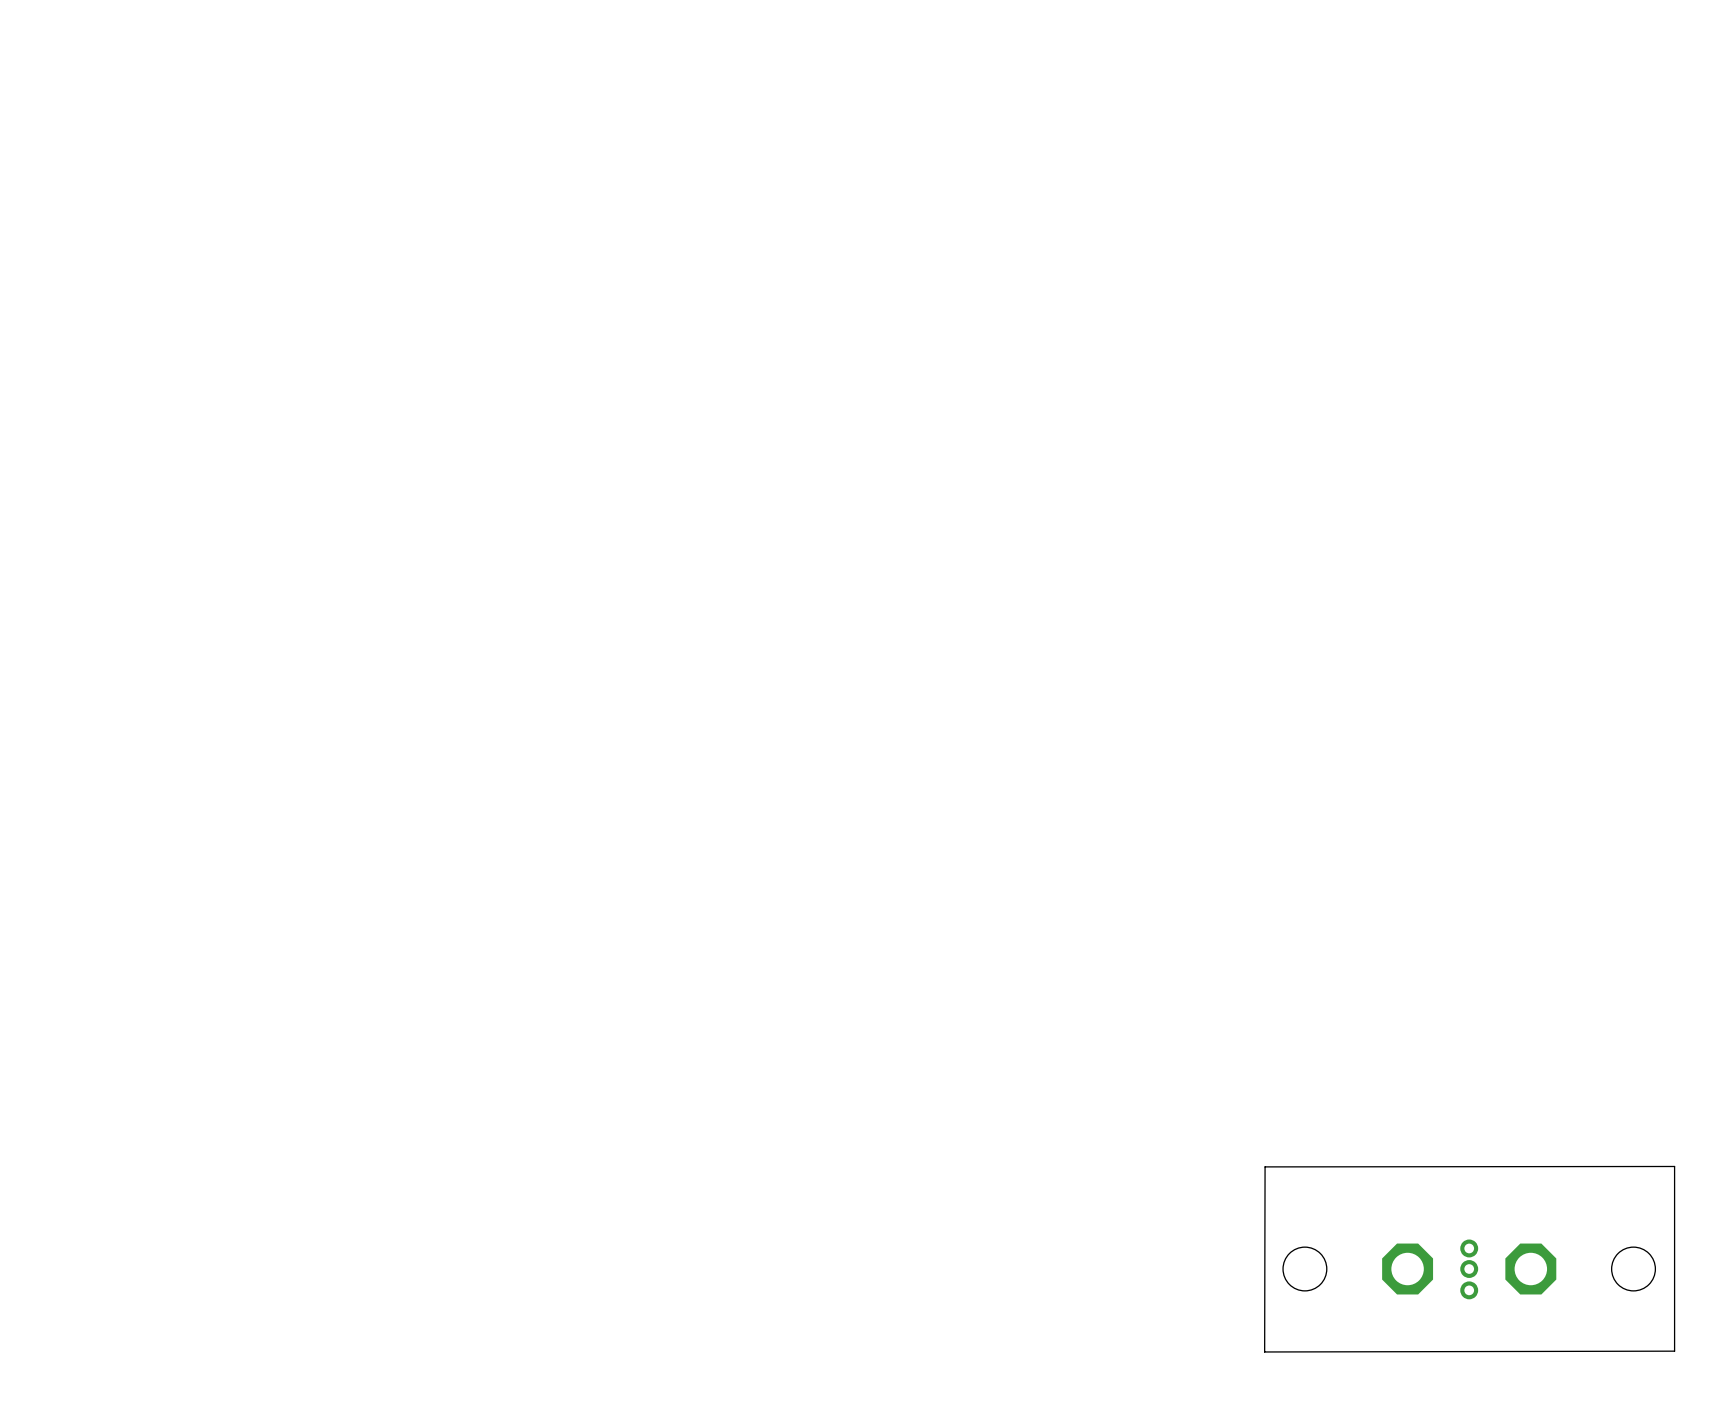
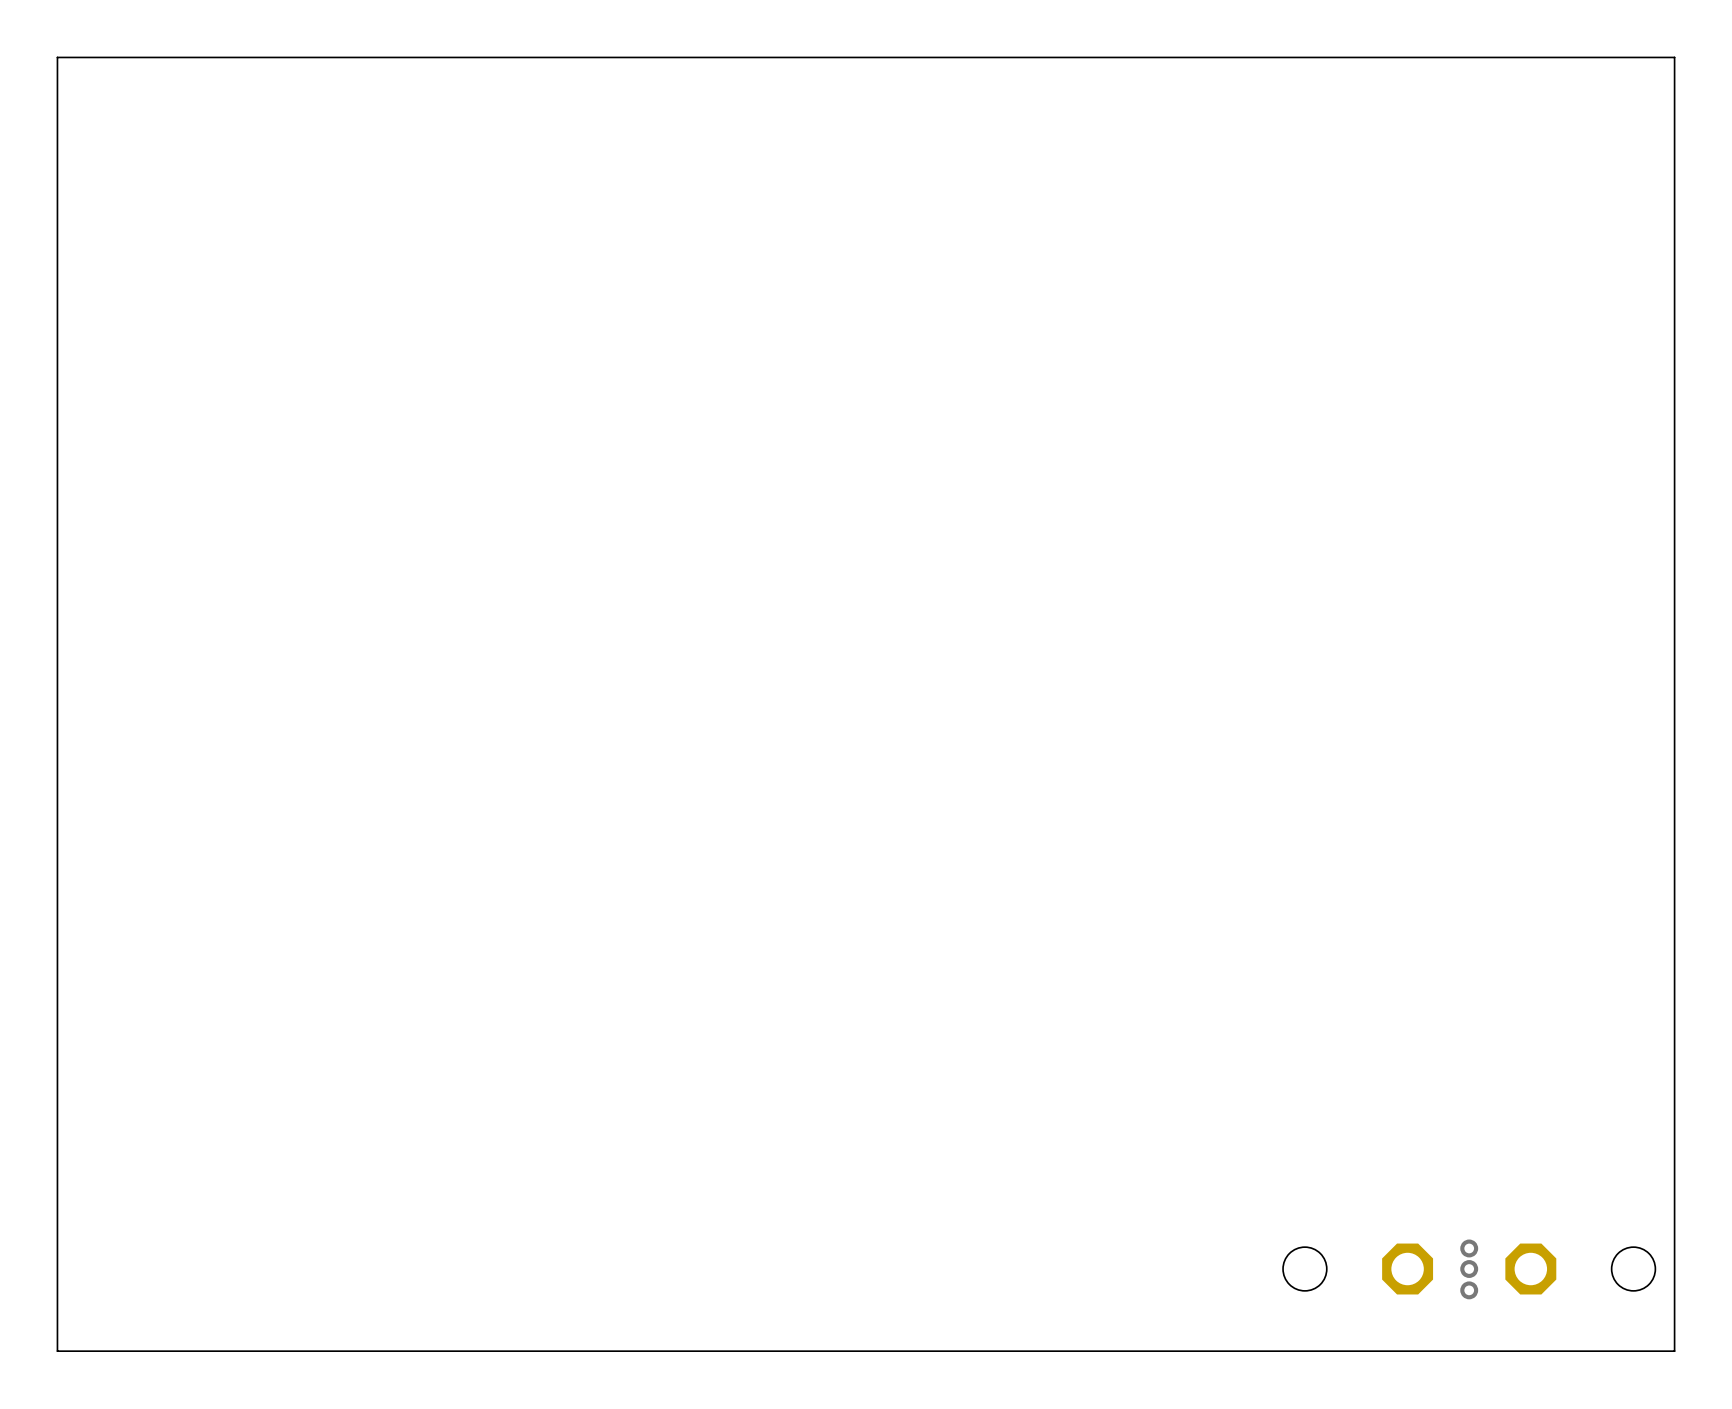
board edge: (1674, 1166) (1265, 1166) (1264, 1351) (1674, 1351) -> (1674, 1166) (1674, 57) (57, 57) (57, 1351) (1674, 1351)

